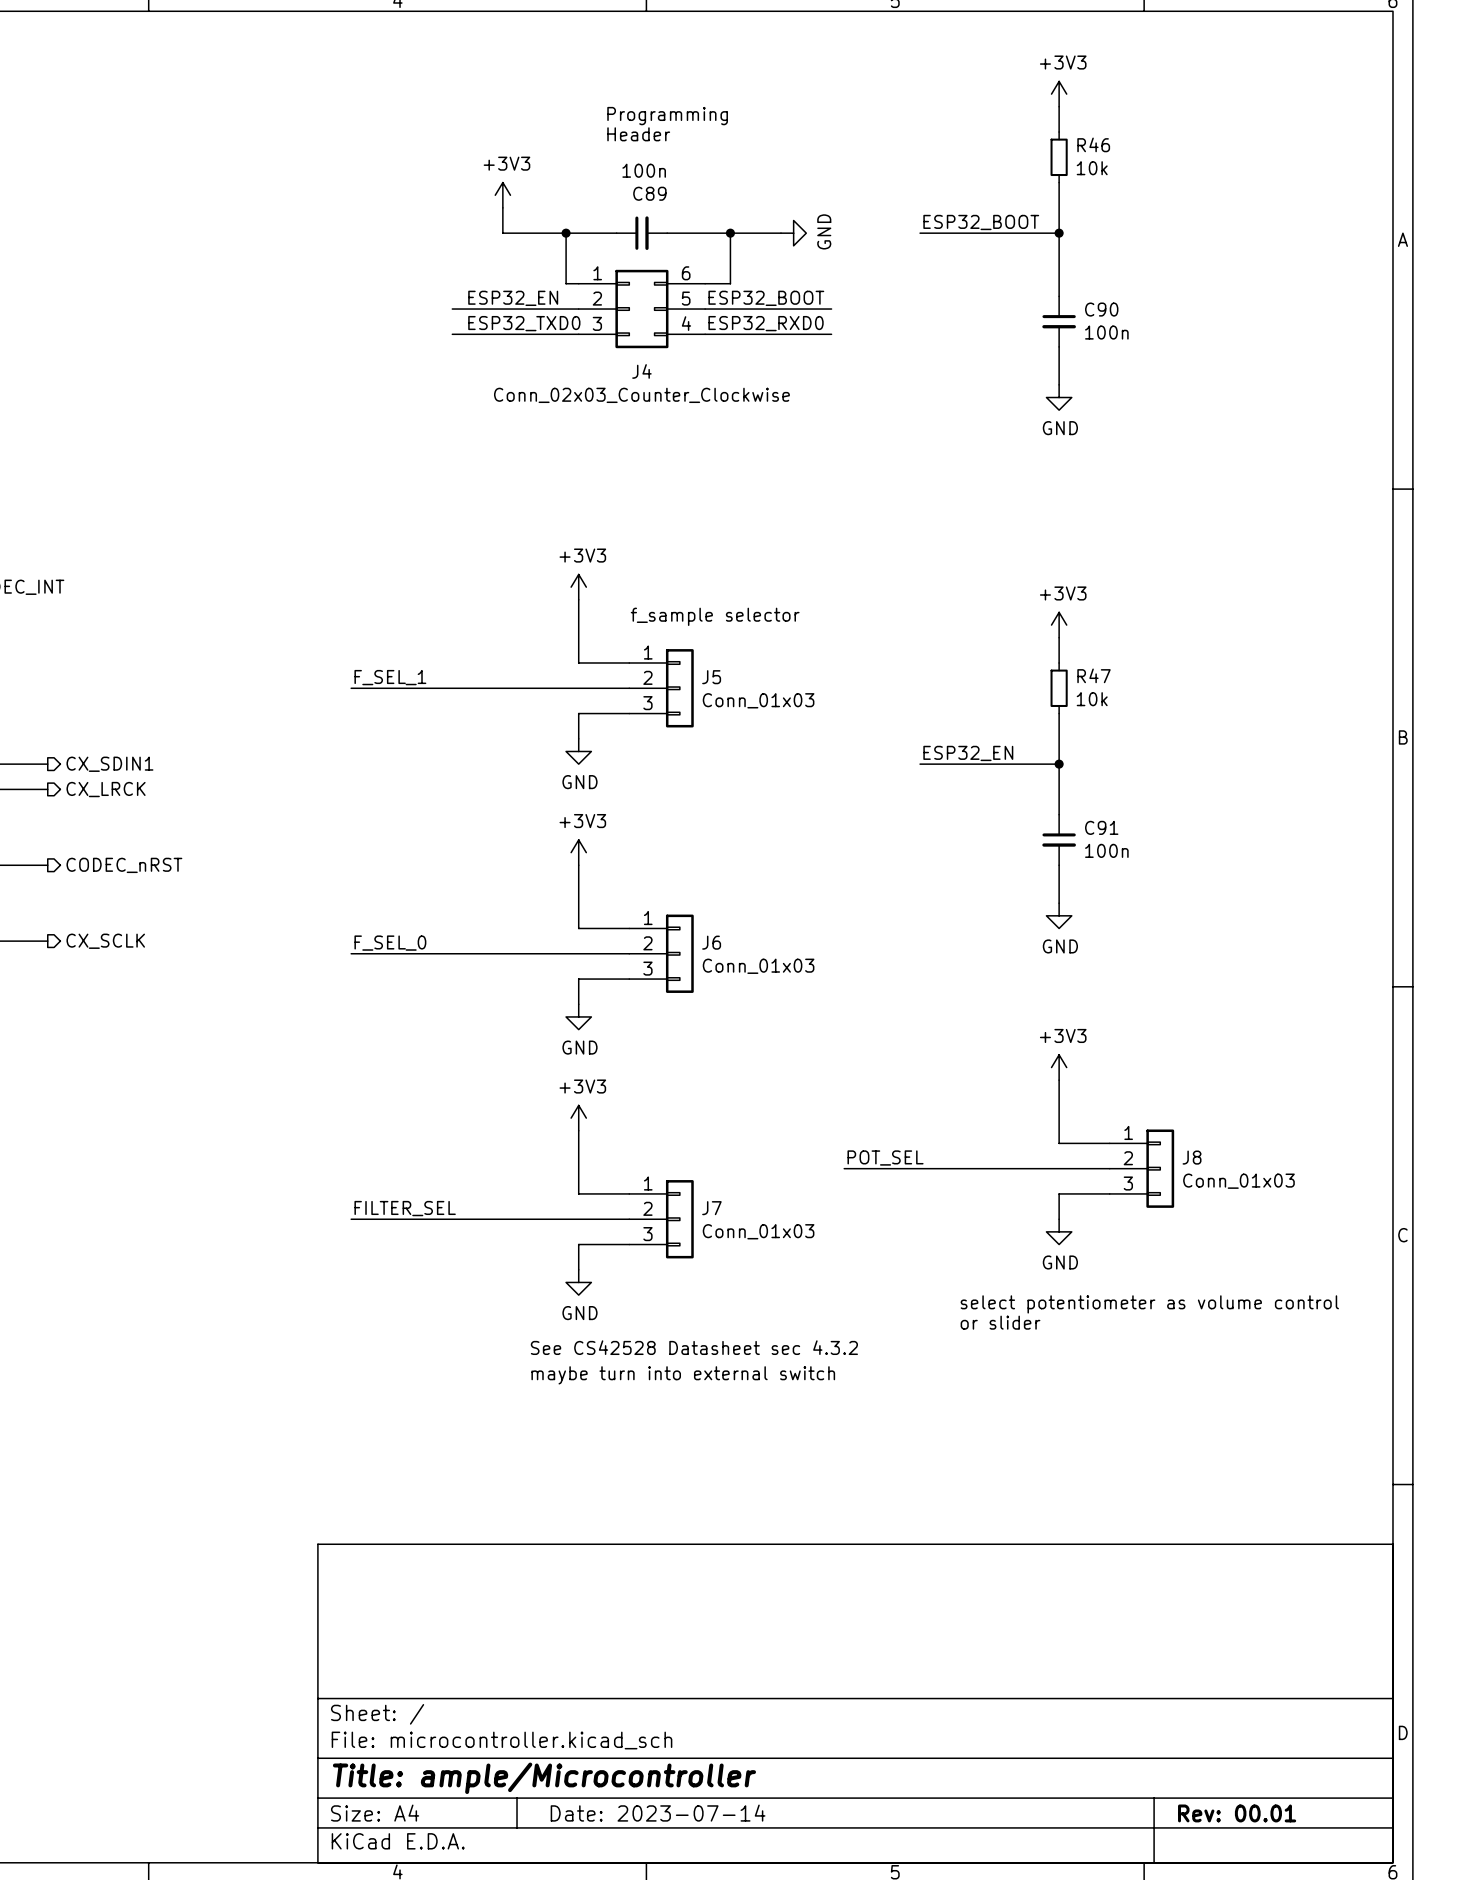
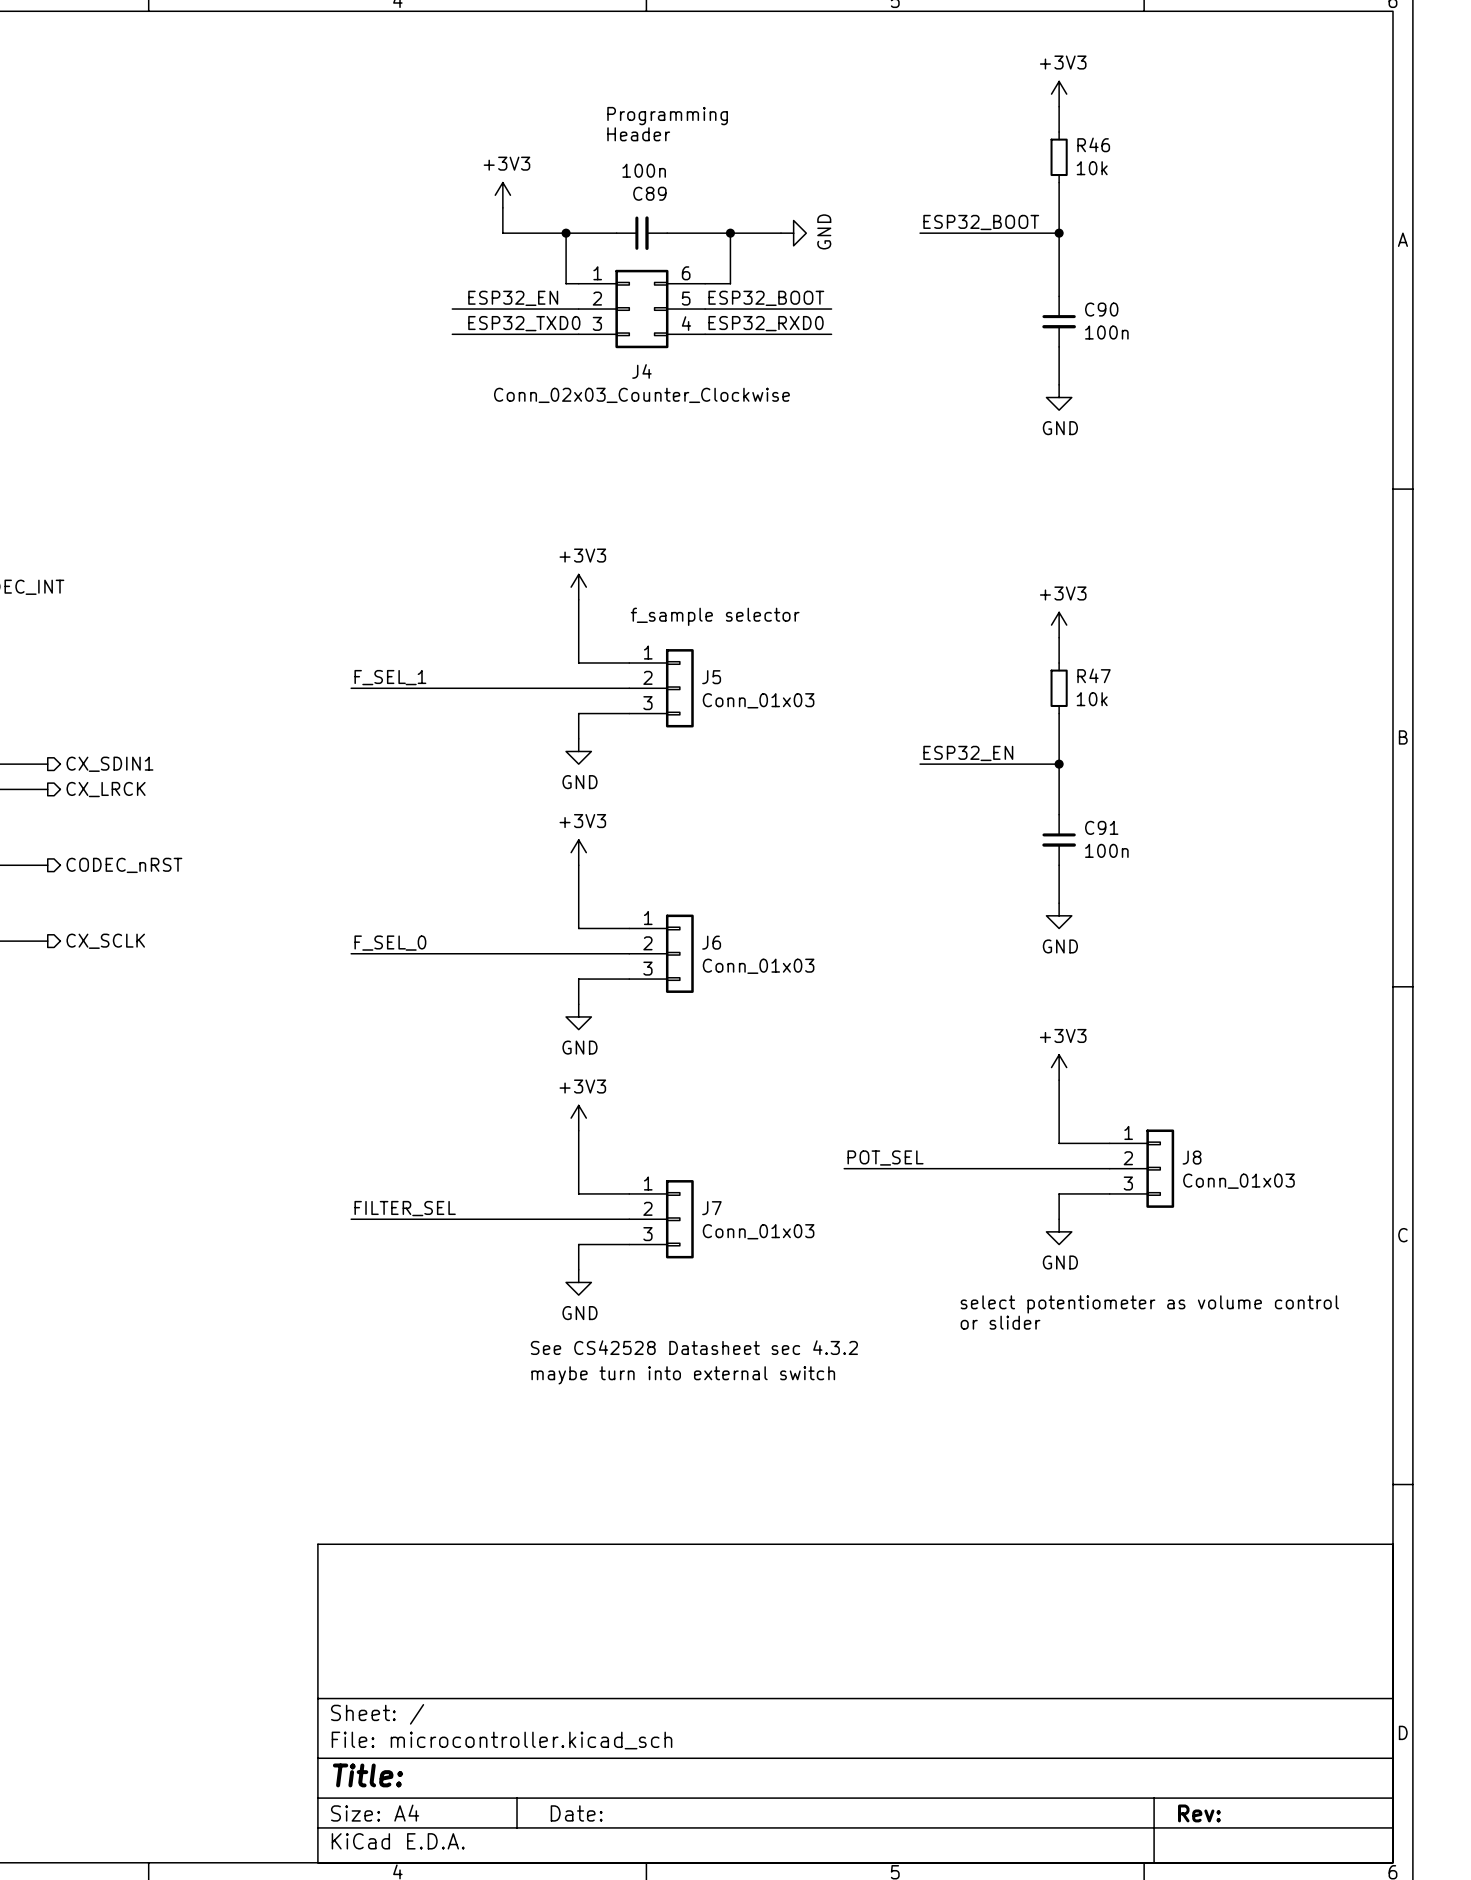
title block: Title: ample/Microcontroller (544, 1778) -> Title: (368, 1775)
title block: Date: 2023-07-14 (658, 1813) -> Date: (576, 1813)
title block: Rev: 00.01 (1237, 1813) -> Rev: (1199, 1813)

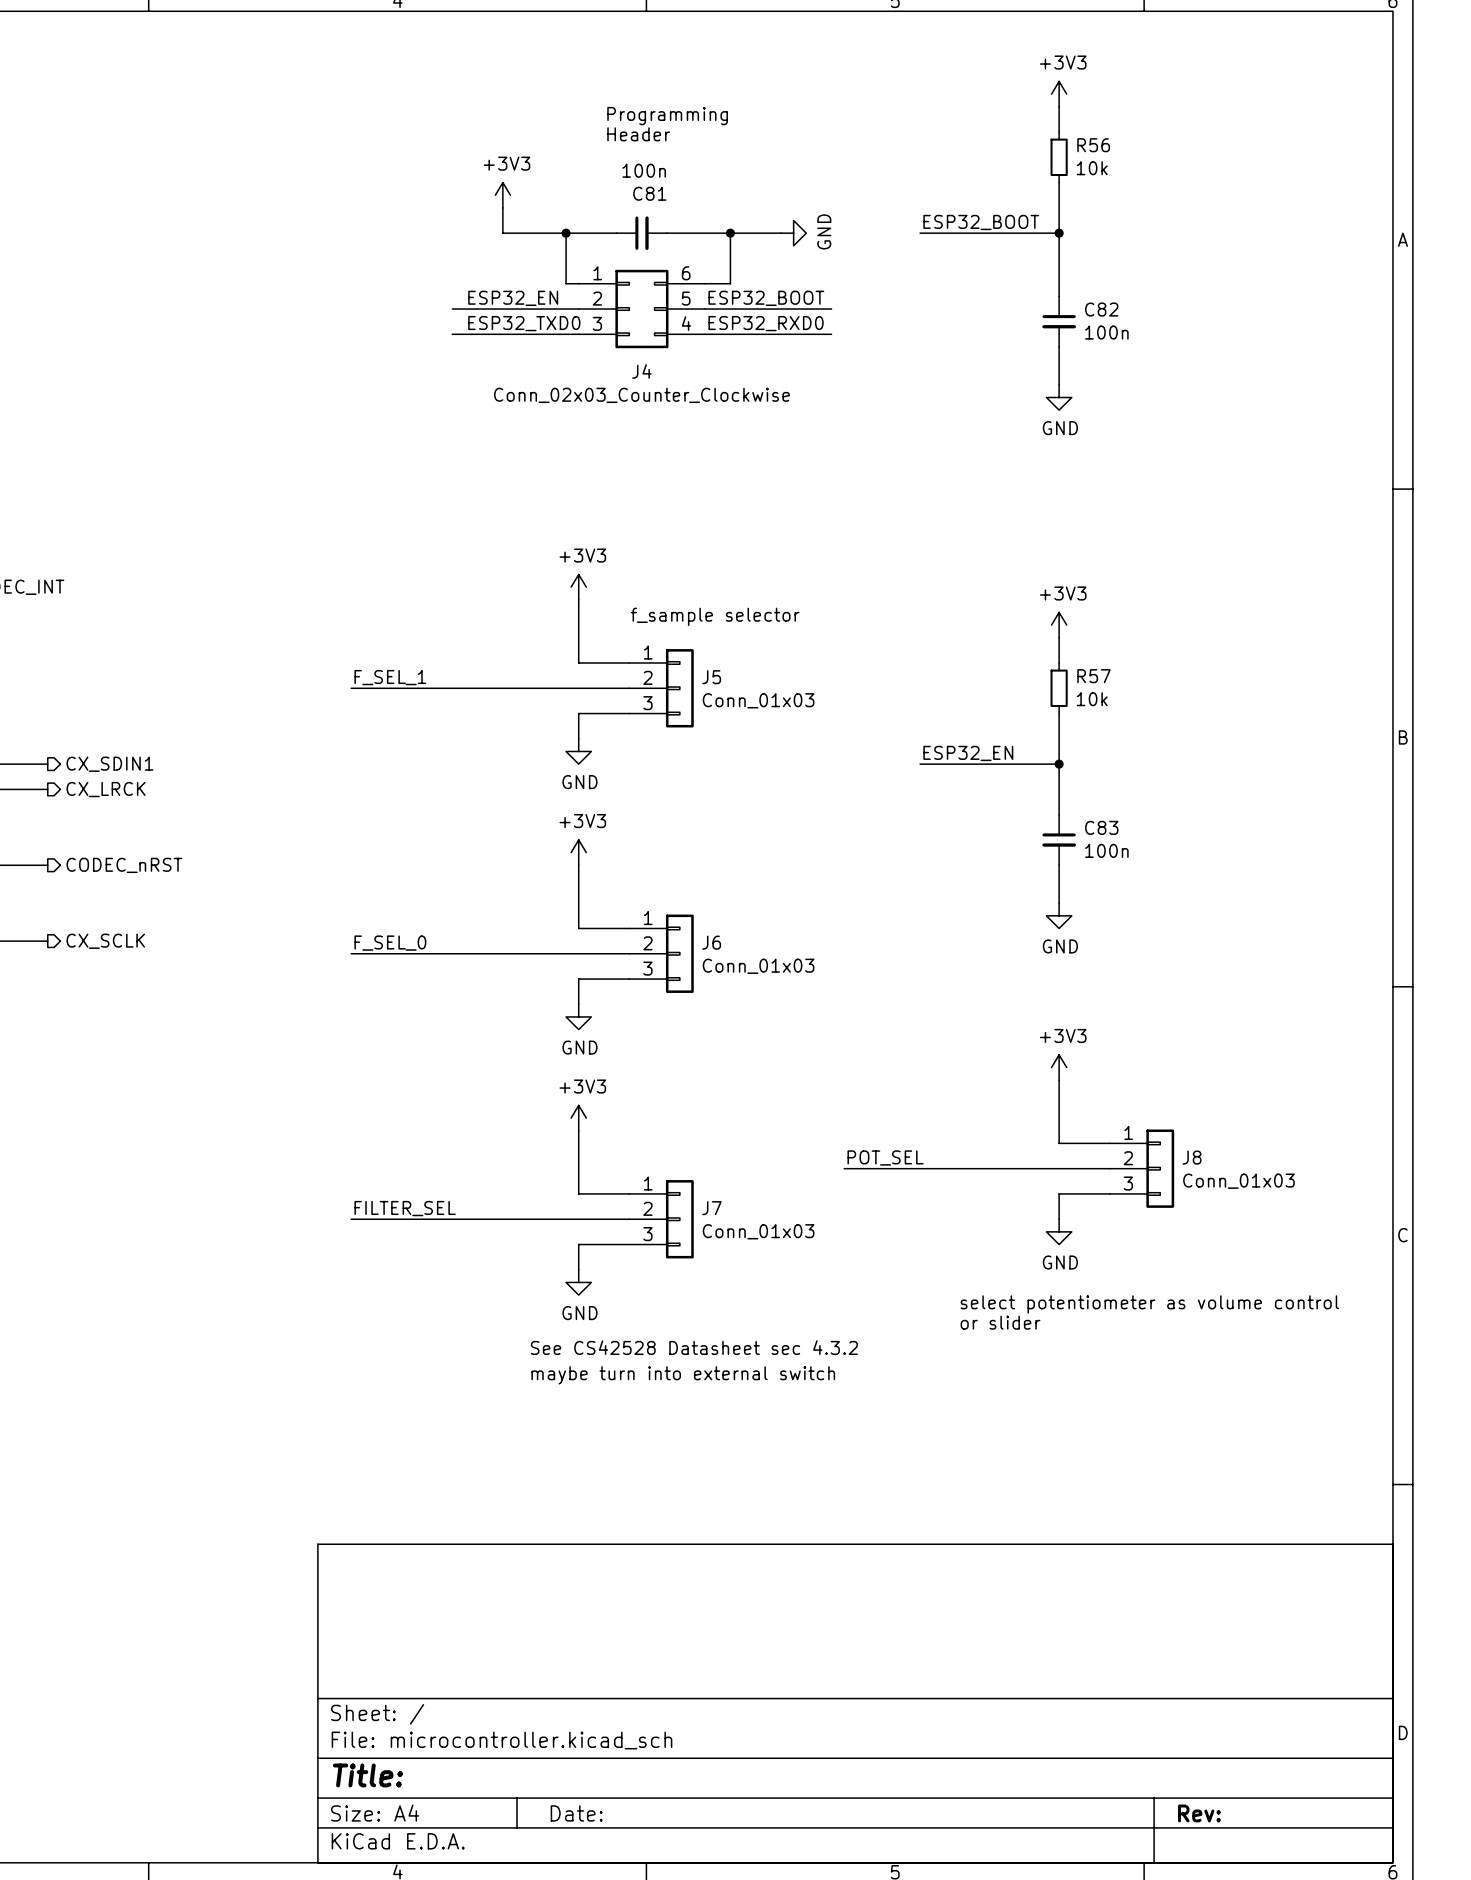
R46 name: R46 (1093, 144) -> R56 (1093, 145)
C89 name: C89 (649, 193) -> C81 (649, 193)
C90 name: C90 (1101, 309) -> C82 (1101, 309)
R47 name: R47 (1094, 675) -> R57 (1094, 676)
C91 name: C91 (1101, 827) -> C83 (1101, 827)

